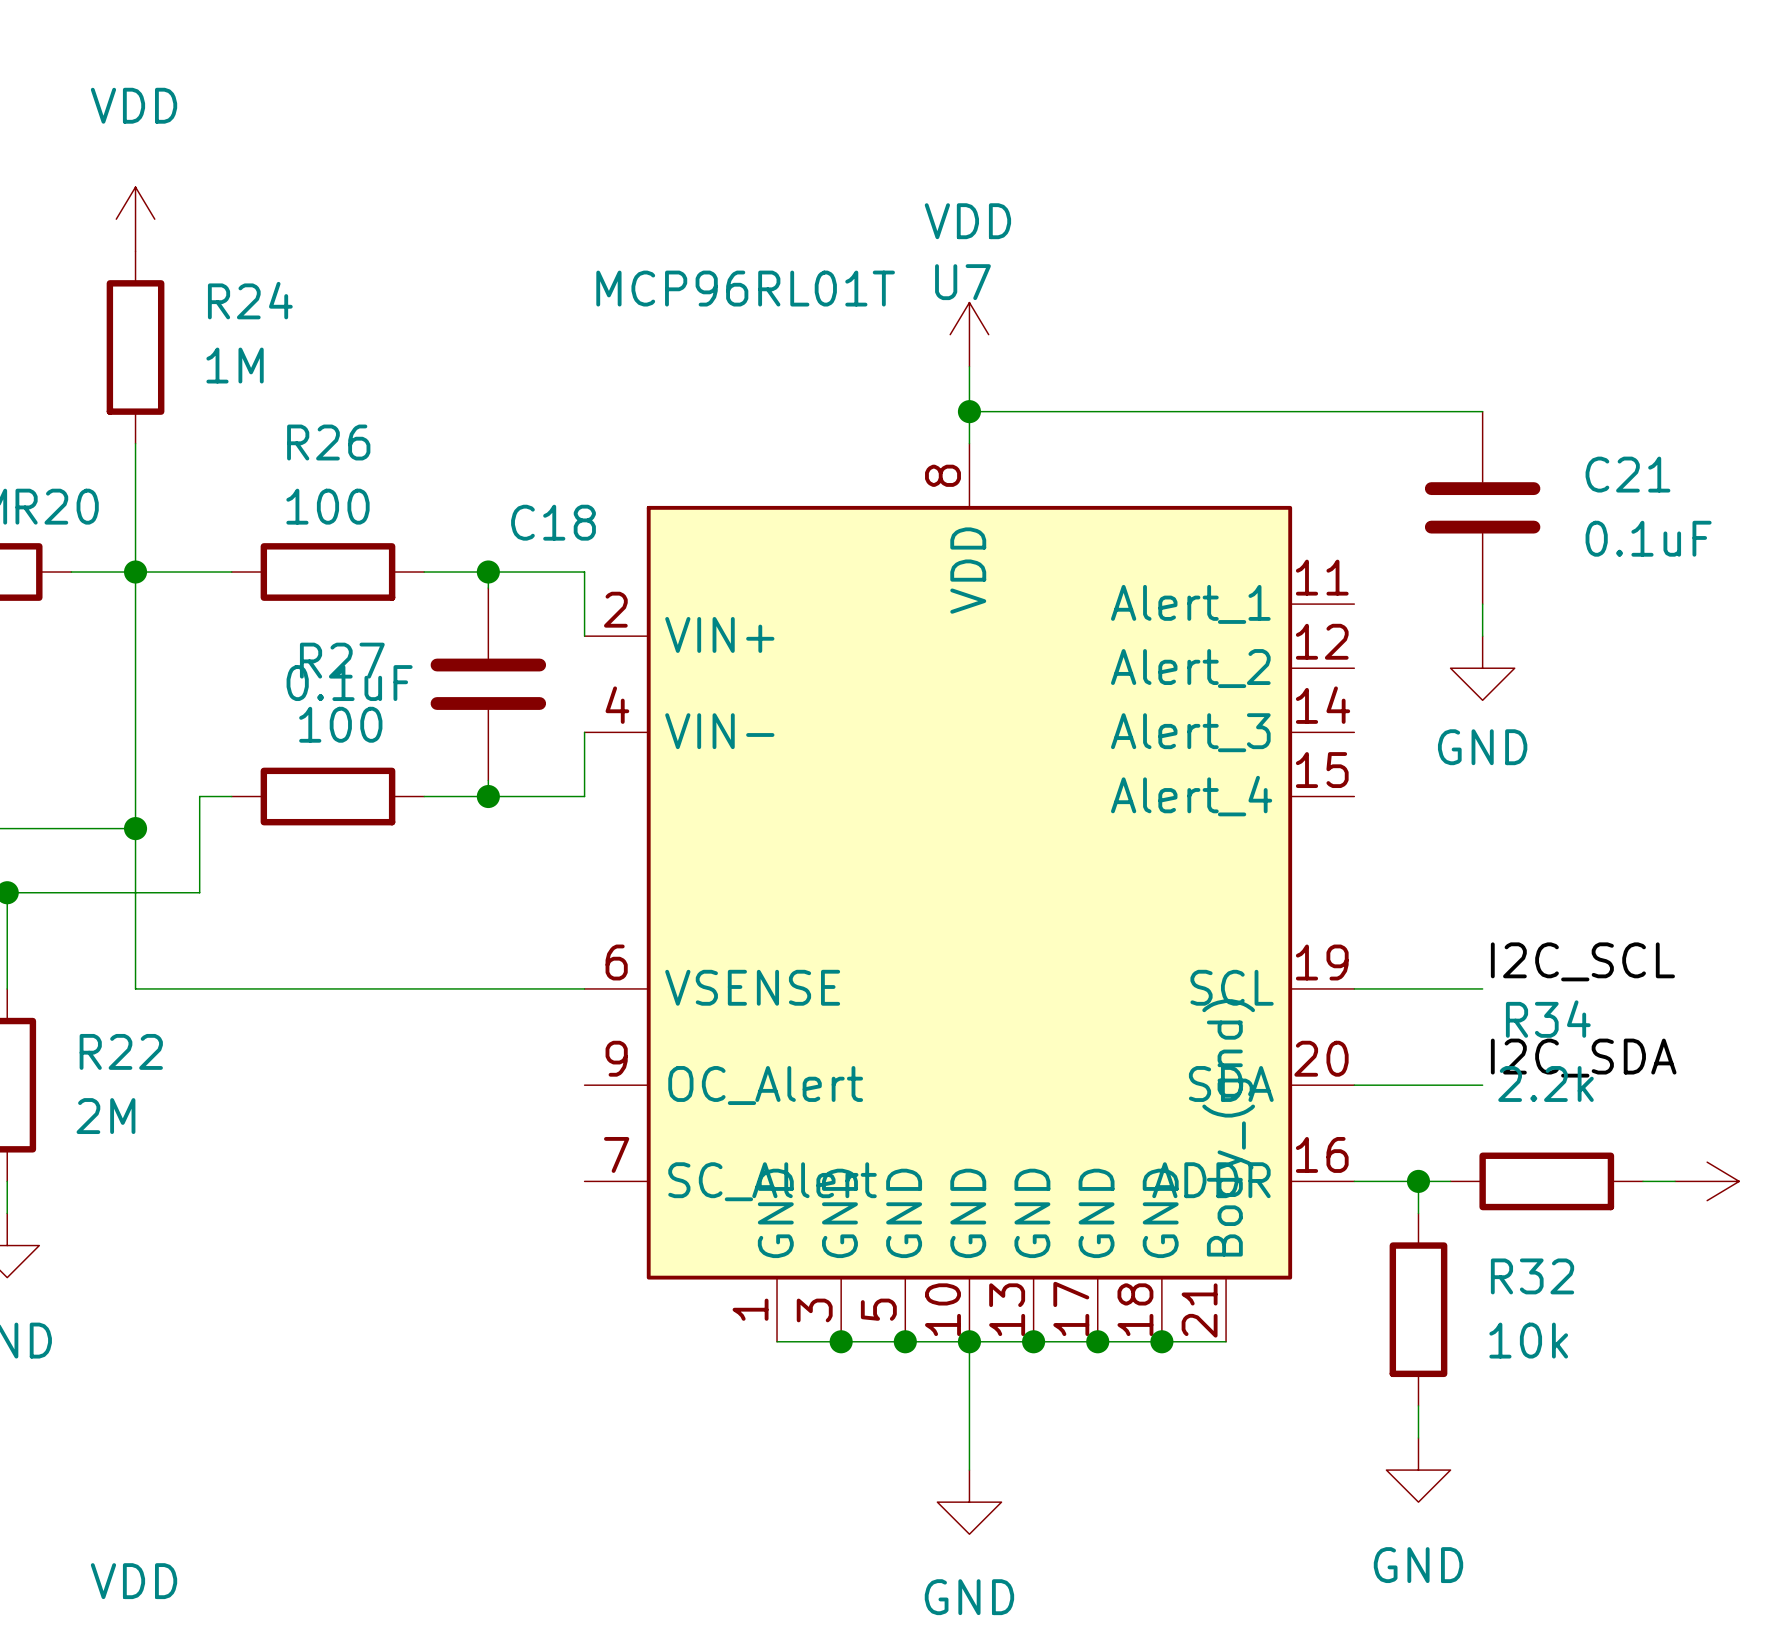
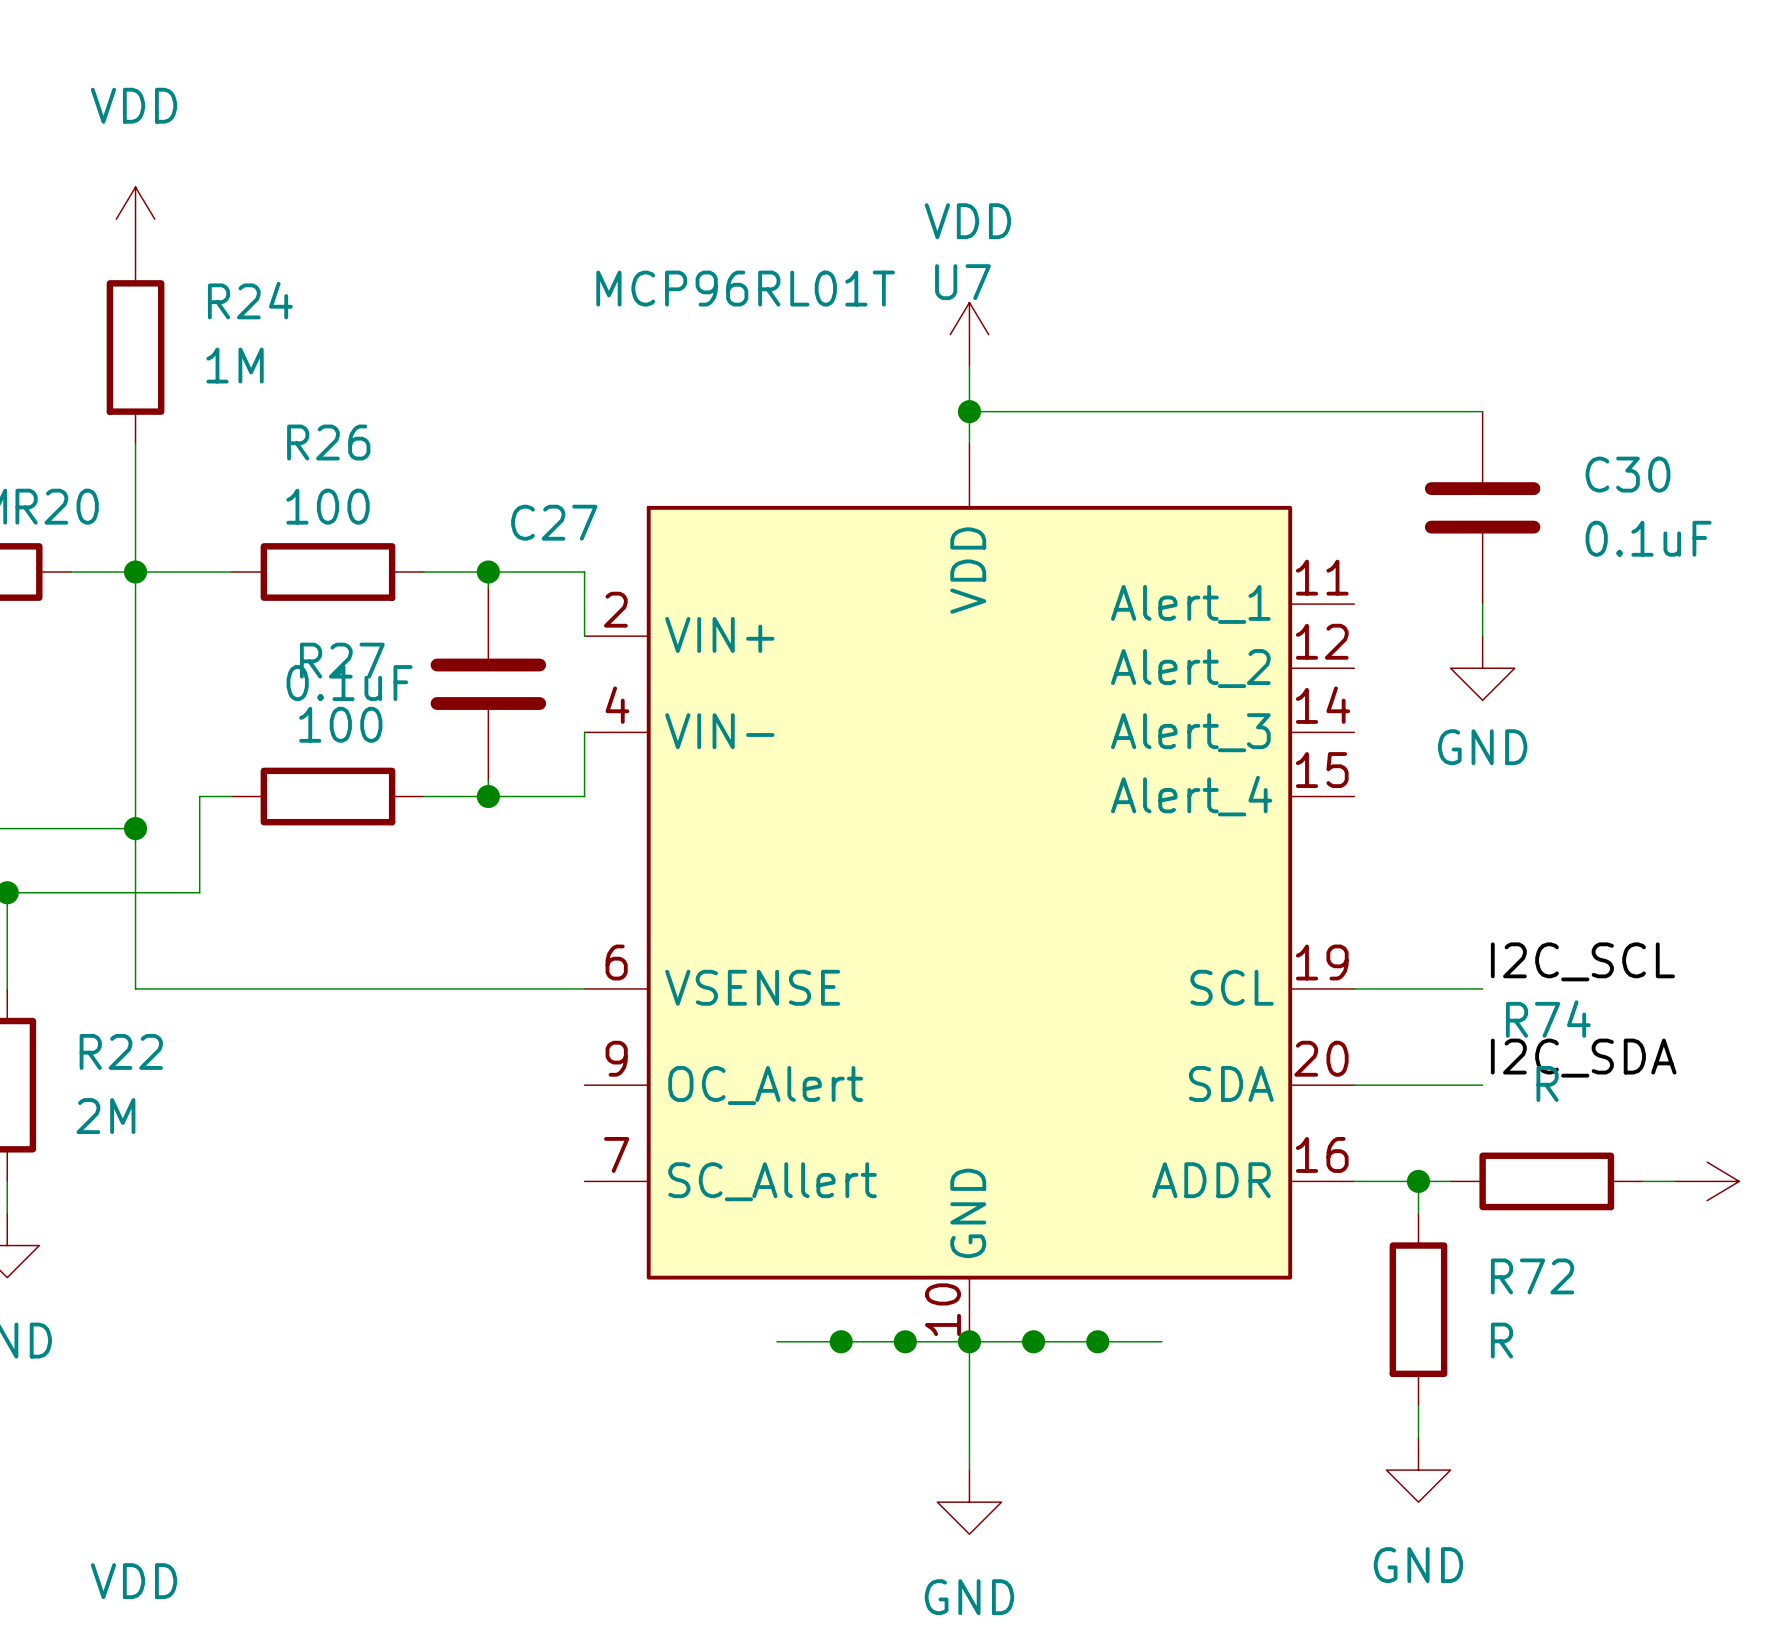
U7 symbol: [584, 443, 1355, 1342] -> [584, 443, 1355, 1342]
C21 name: C21 (1627, 474) -> C30 (1627, 474)
C18 name: C18 (553, 522) -> C27 (554, 522)
R34 name: R34 (1548, 1019) -> R74 (1548, 1019)
R34 value: 2.2k (1546, 1083) -> R (1547, 1083)
R32 name: R32 (1532, 1276) -> R72 (1532, 1276)
R32 value: 10k (1528, 1340) -> R (1501, 1340)
wire: (1161, 1341) (1226, 1341) -> none
junction: (1161, 1341) -> none

